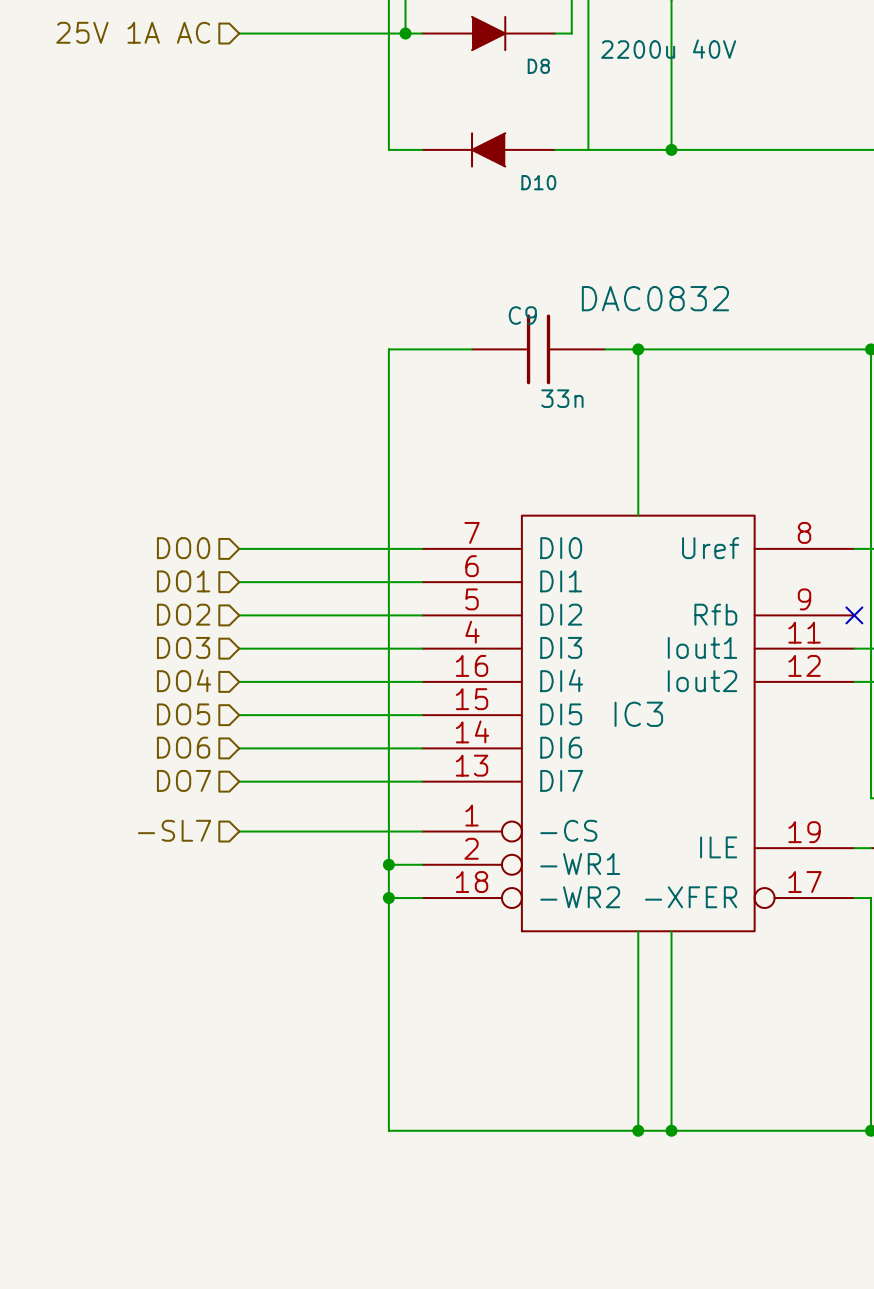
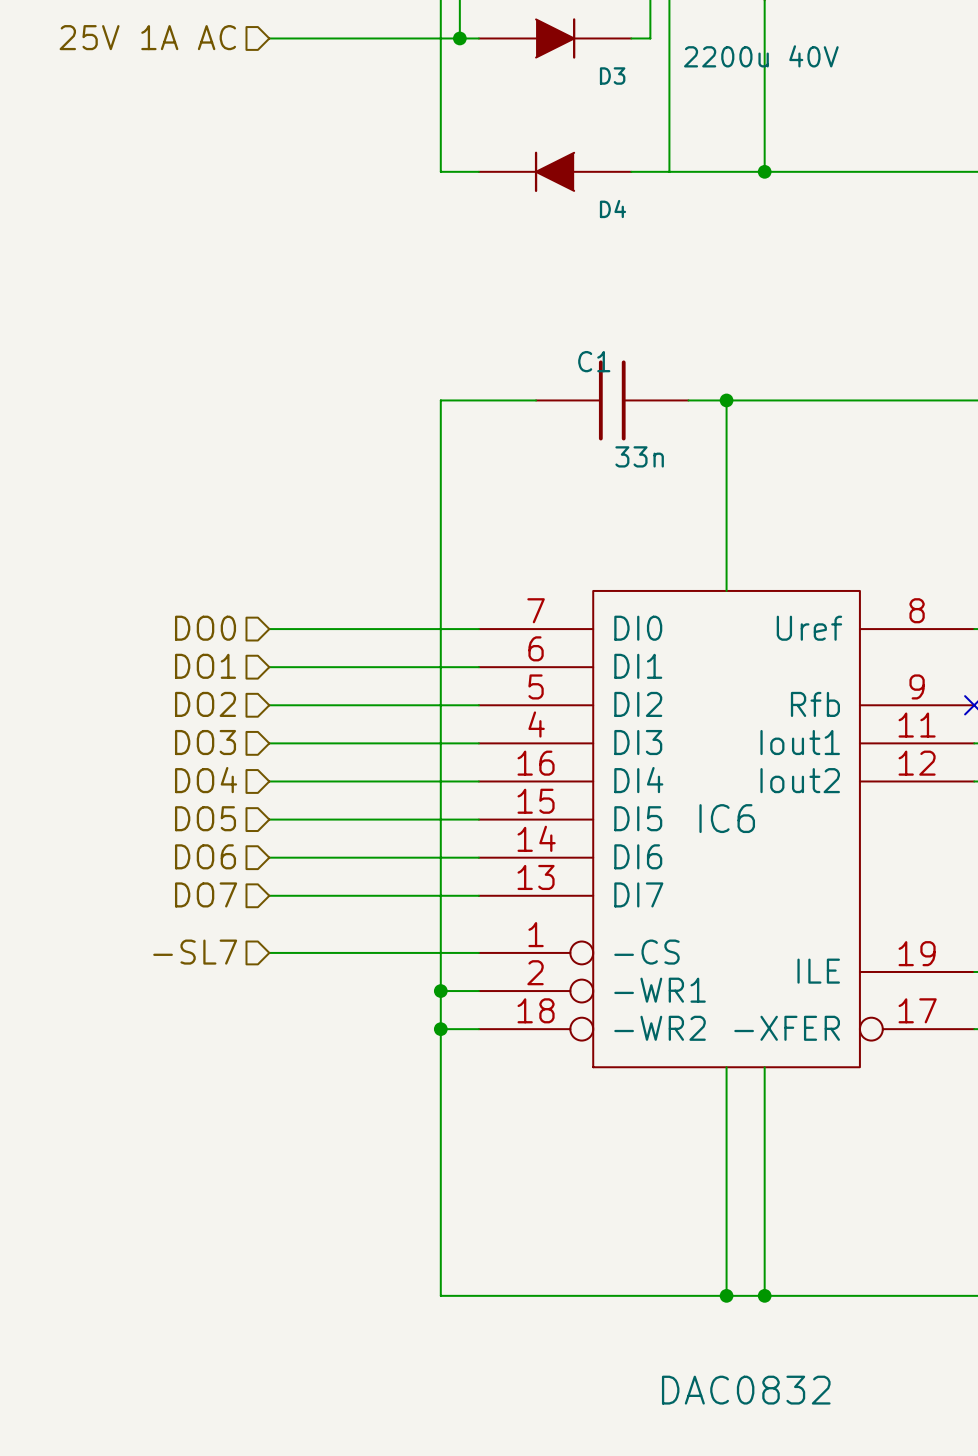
D8 name: D8 (538, 66) -> D3 (612, 76)
D10 name: D10 (538, 182) -> D4 (612, 209)
IC3 value position: DAC0832 (655, 298) -> DAC0832 (746, 1390)
C9 name: C9 (522, 315) -> C1 (594, 361)
IC3 name: IC3 (638, 714) -> IC6 (727, 818)

